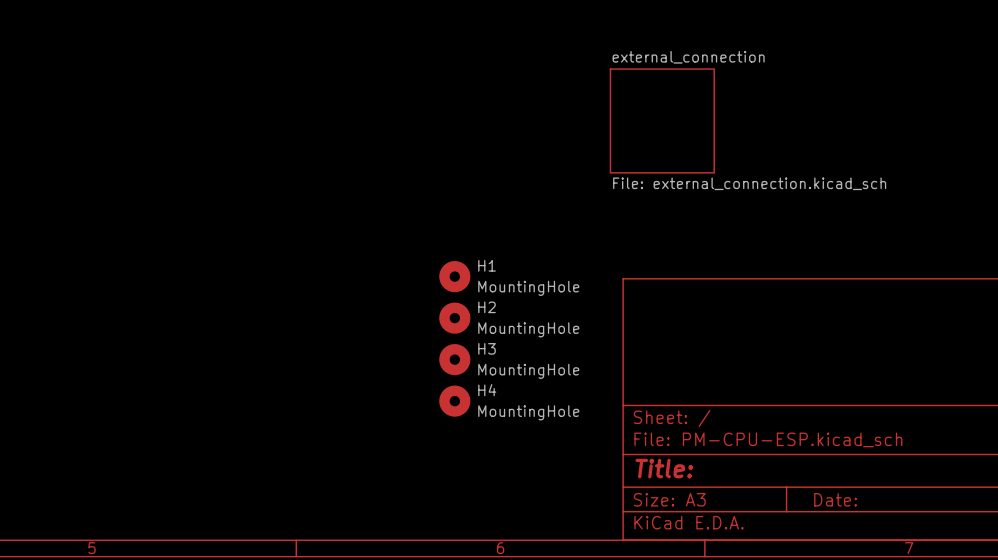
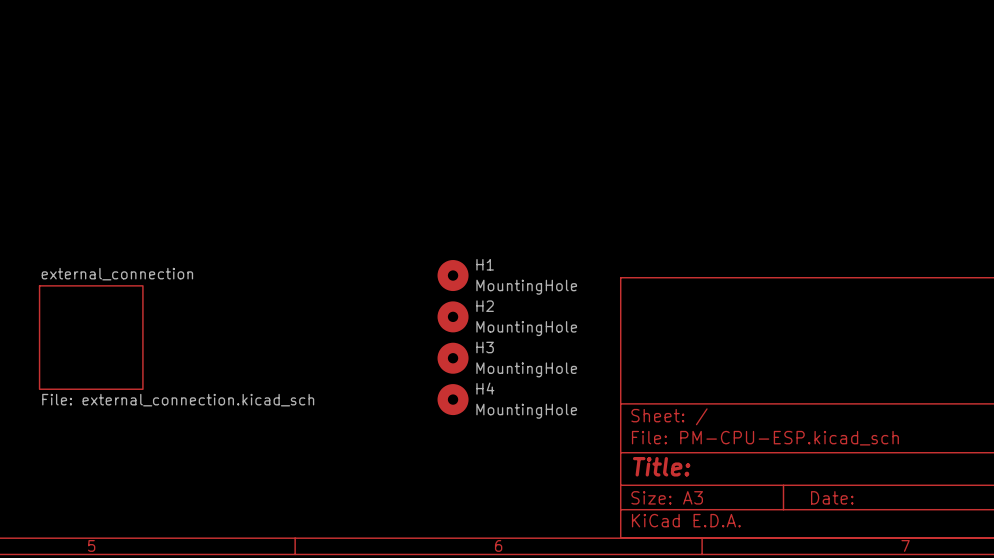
sheet external_connection: File: external_connection.kicad_sch (662, 120) -> none
sheet external_connection: none -> File: external_connection.kicad_sch (91, 337)

